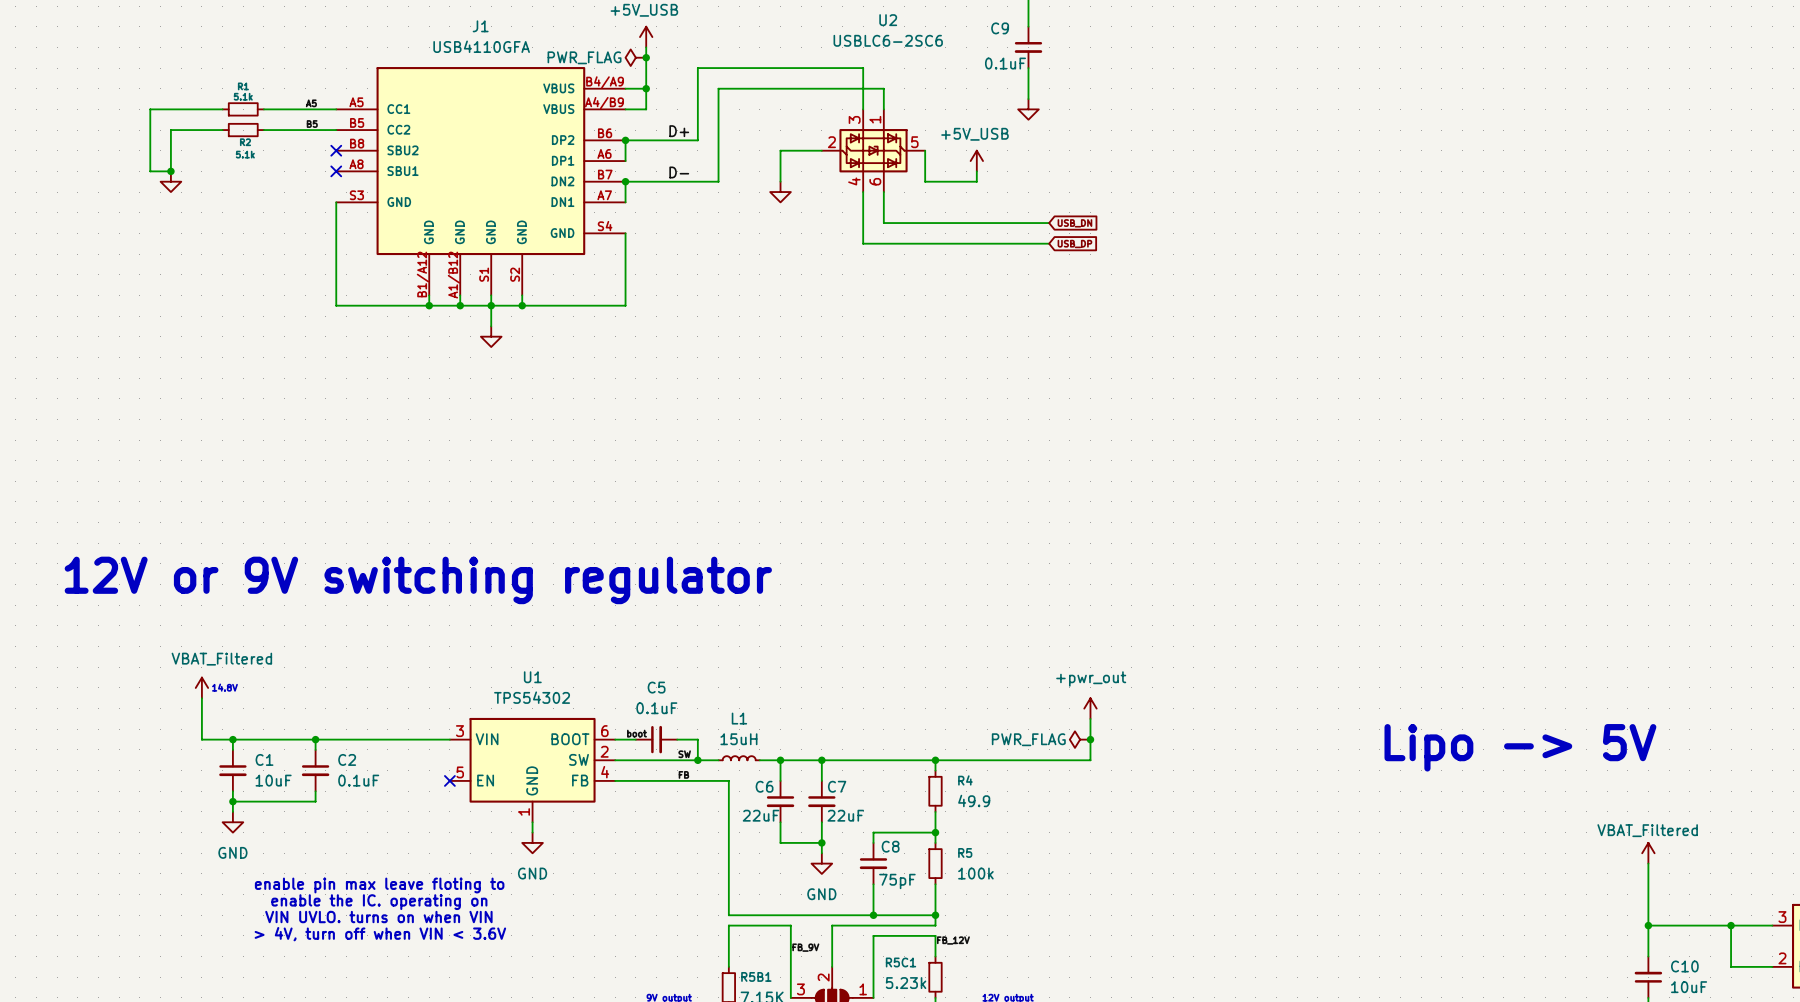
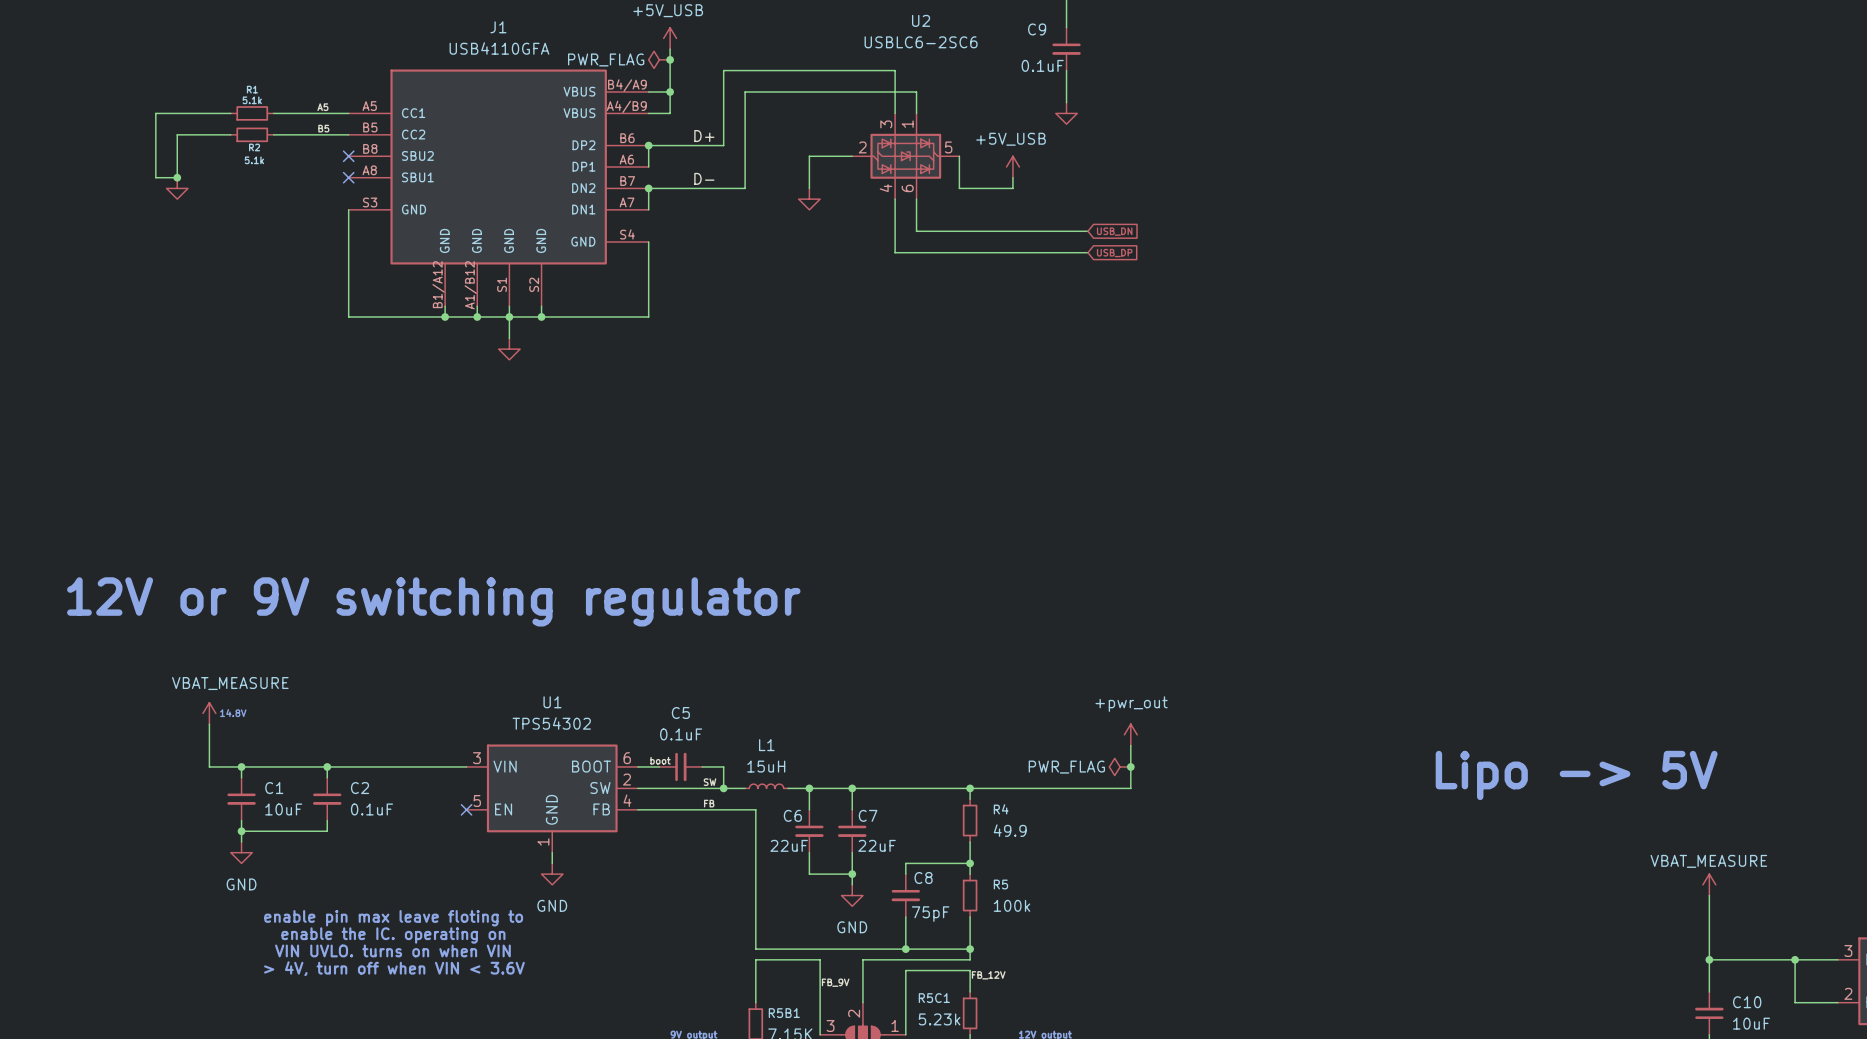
power symbol: VBAT_Filtered (201, 687) -> VBAT_MEASURE (209, 713)
power symbol: VBAT_Filtered (1648, 853) -> VBAT_MEASURE (1709, 884)

